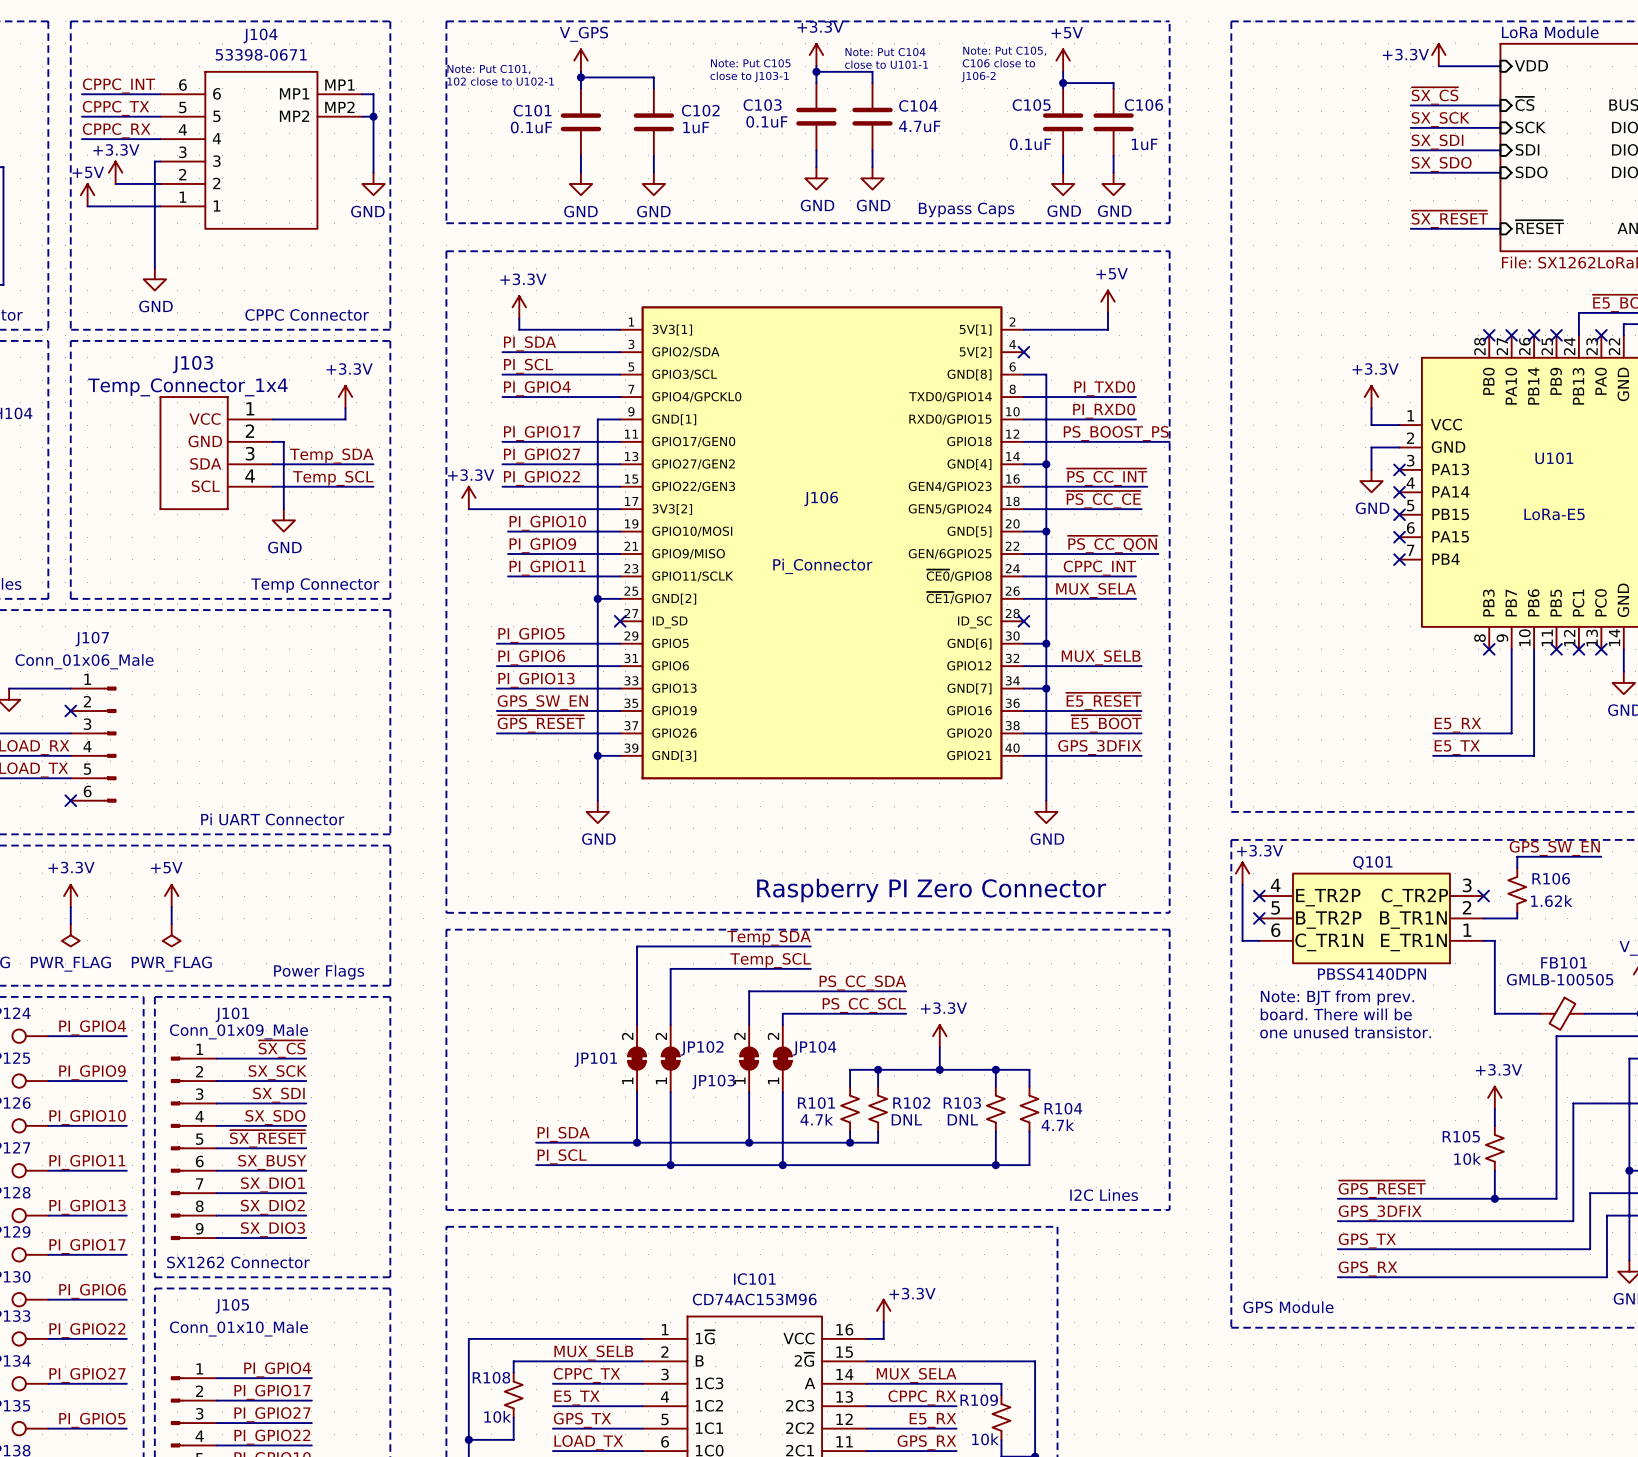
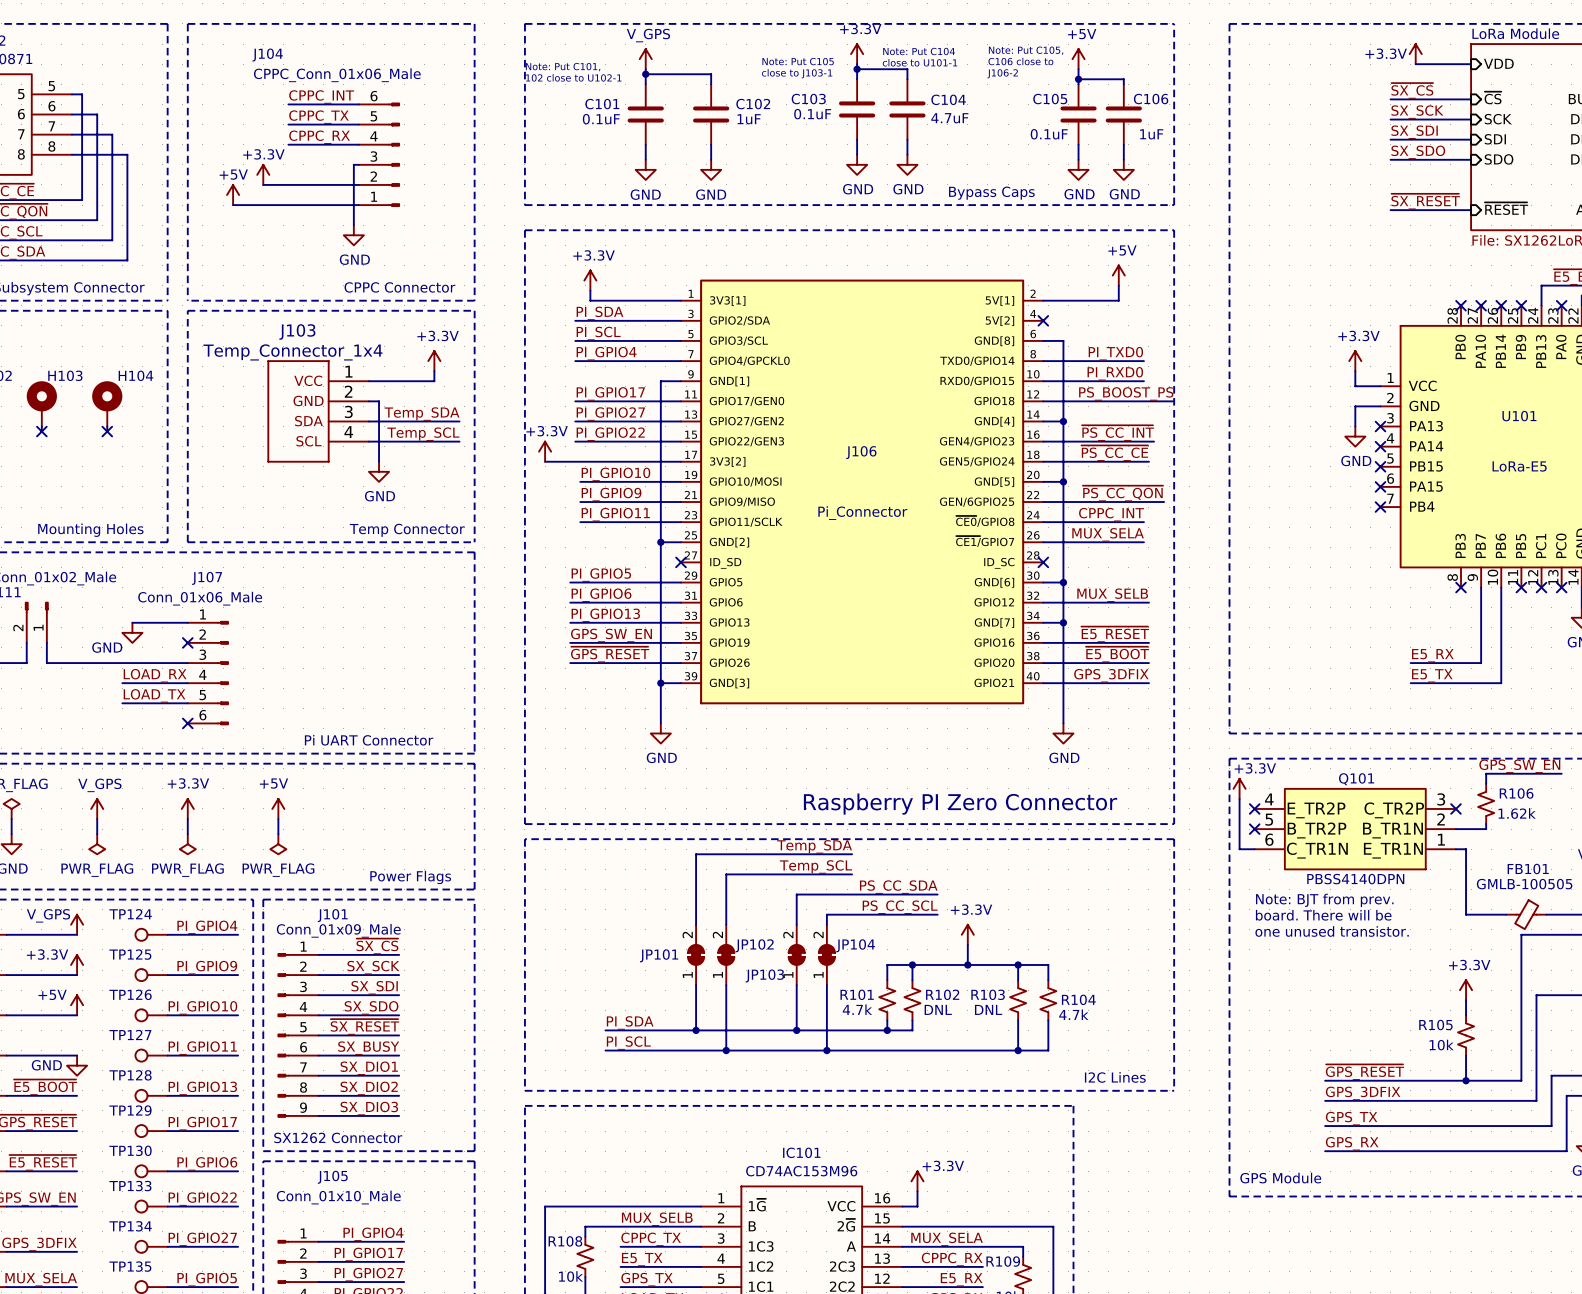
J104 name position: J104 (260, 35) -> J104 (267, 55)
J104 value: 53398-0671 (261, 54) -> CPPC_Conn_01x06_Male (337, 75)
J104 symbol: [160, 71, 363, 230] -> [358, 102, 400, 207]
label position: CPPC_INT (119, 85) -> CPPC_INT (321, 96)
wire: (81, 94) (160, 94) -> (288, 104) (358, 104)
wire: (362, 94) (373, 94) (373, 172) -> none
label position: CPPC_TX (115, 108) -> CPPC_TX (318, 117)
wire: (81, 116) (160, 116) -> (288, 124) (358, 124)
wire: (362, 116) (373, 116) -> none
junction: (373, 116) -> none
label position: CPPC_RX (116, 130) -> CPPC_RX (319, 137)
wire: (81, 139) (160, 139) -> (288, 144) (358, 144)
wire: (160, 161) (154, 161) (154, 268) -> none
power symbol position: +3.3V (115, 172) -> +3.3V (263, 174)
wire: none -> (358, 164) (353, 164) (353, 225)
wire: (115, 183) (160, 183) -> none
power symbol: GND (373, 183) -> none
power symbol position: +5V (87, 195) -> +5V (233, 195)
wire: none -> (263, 184) (358, 184)
wire: (87, 206) (160, 206) -> none
wire: none -> (233, 205) (358, 205)
power symbol: none -> GND (353, 235)
power symbol: GND (154, 279) -> none

